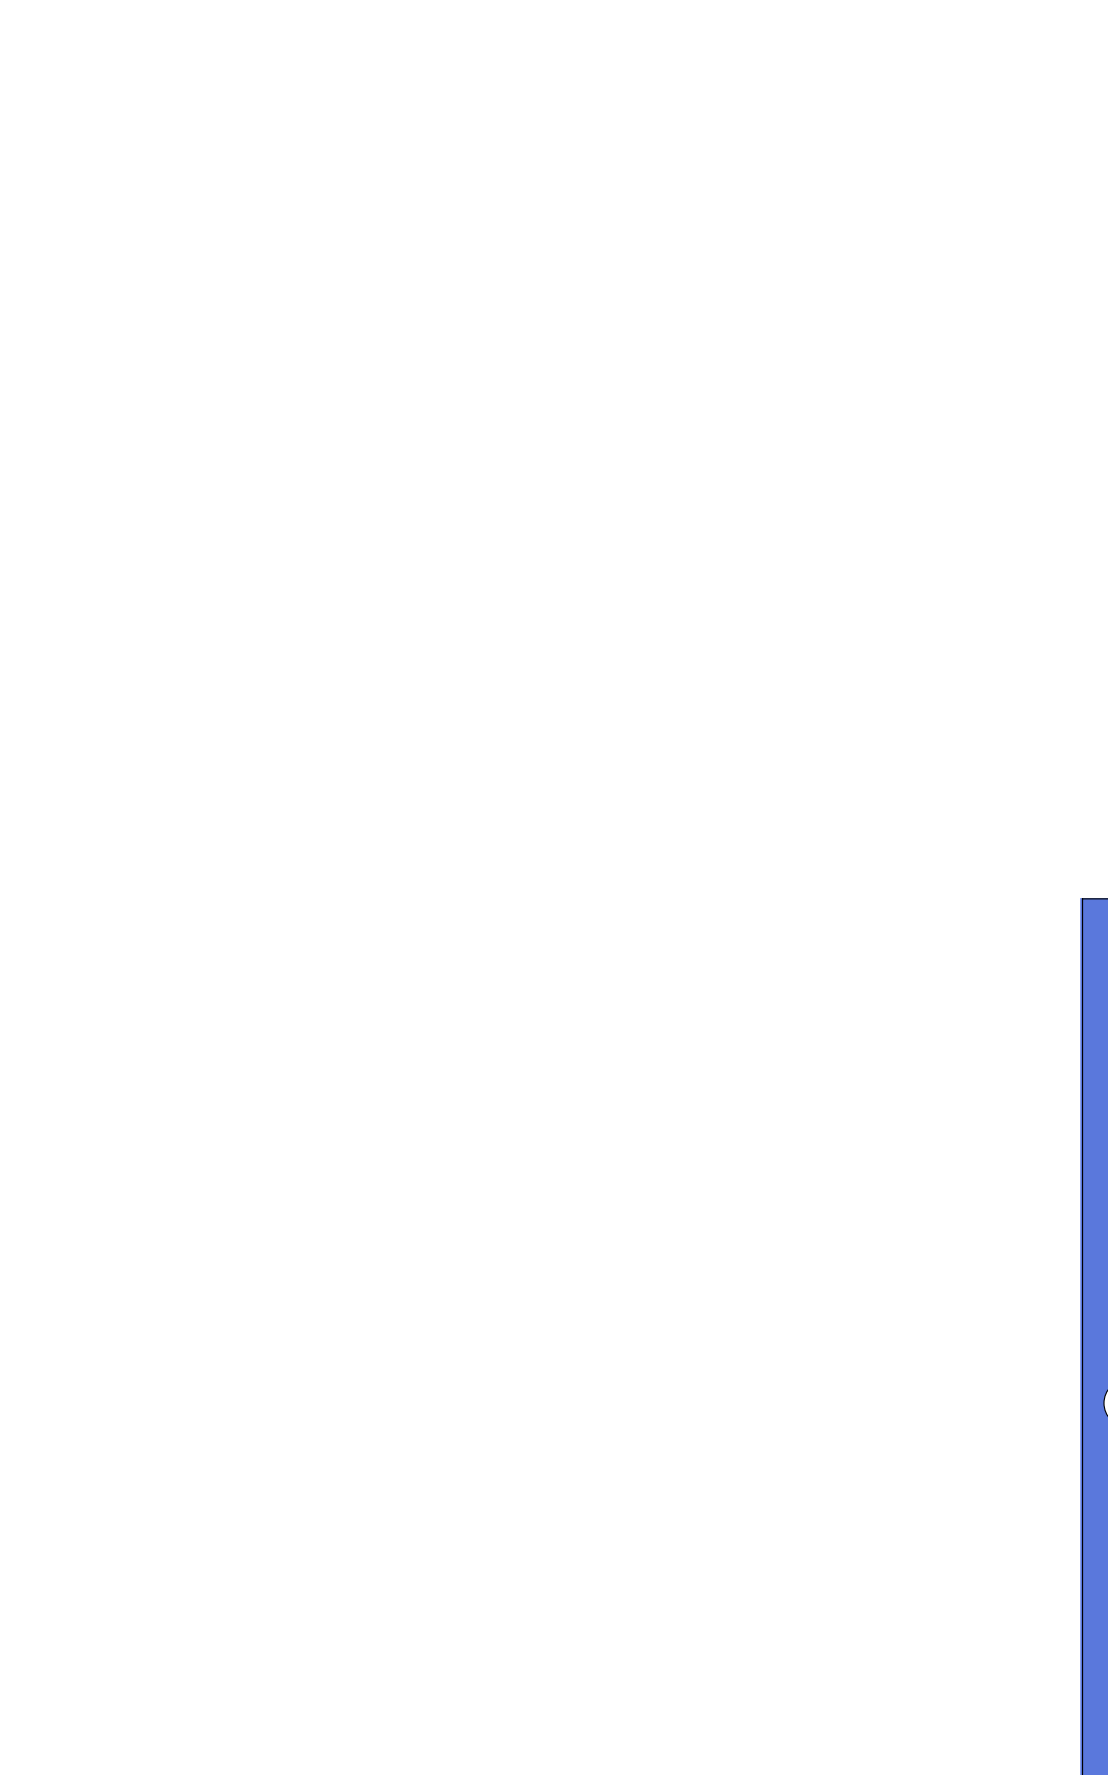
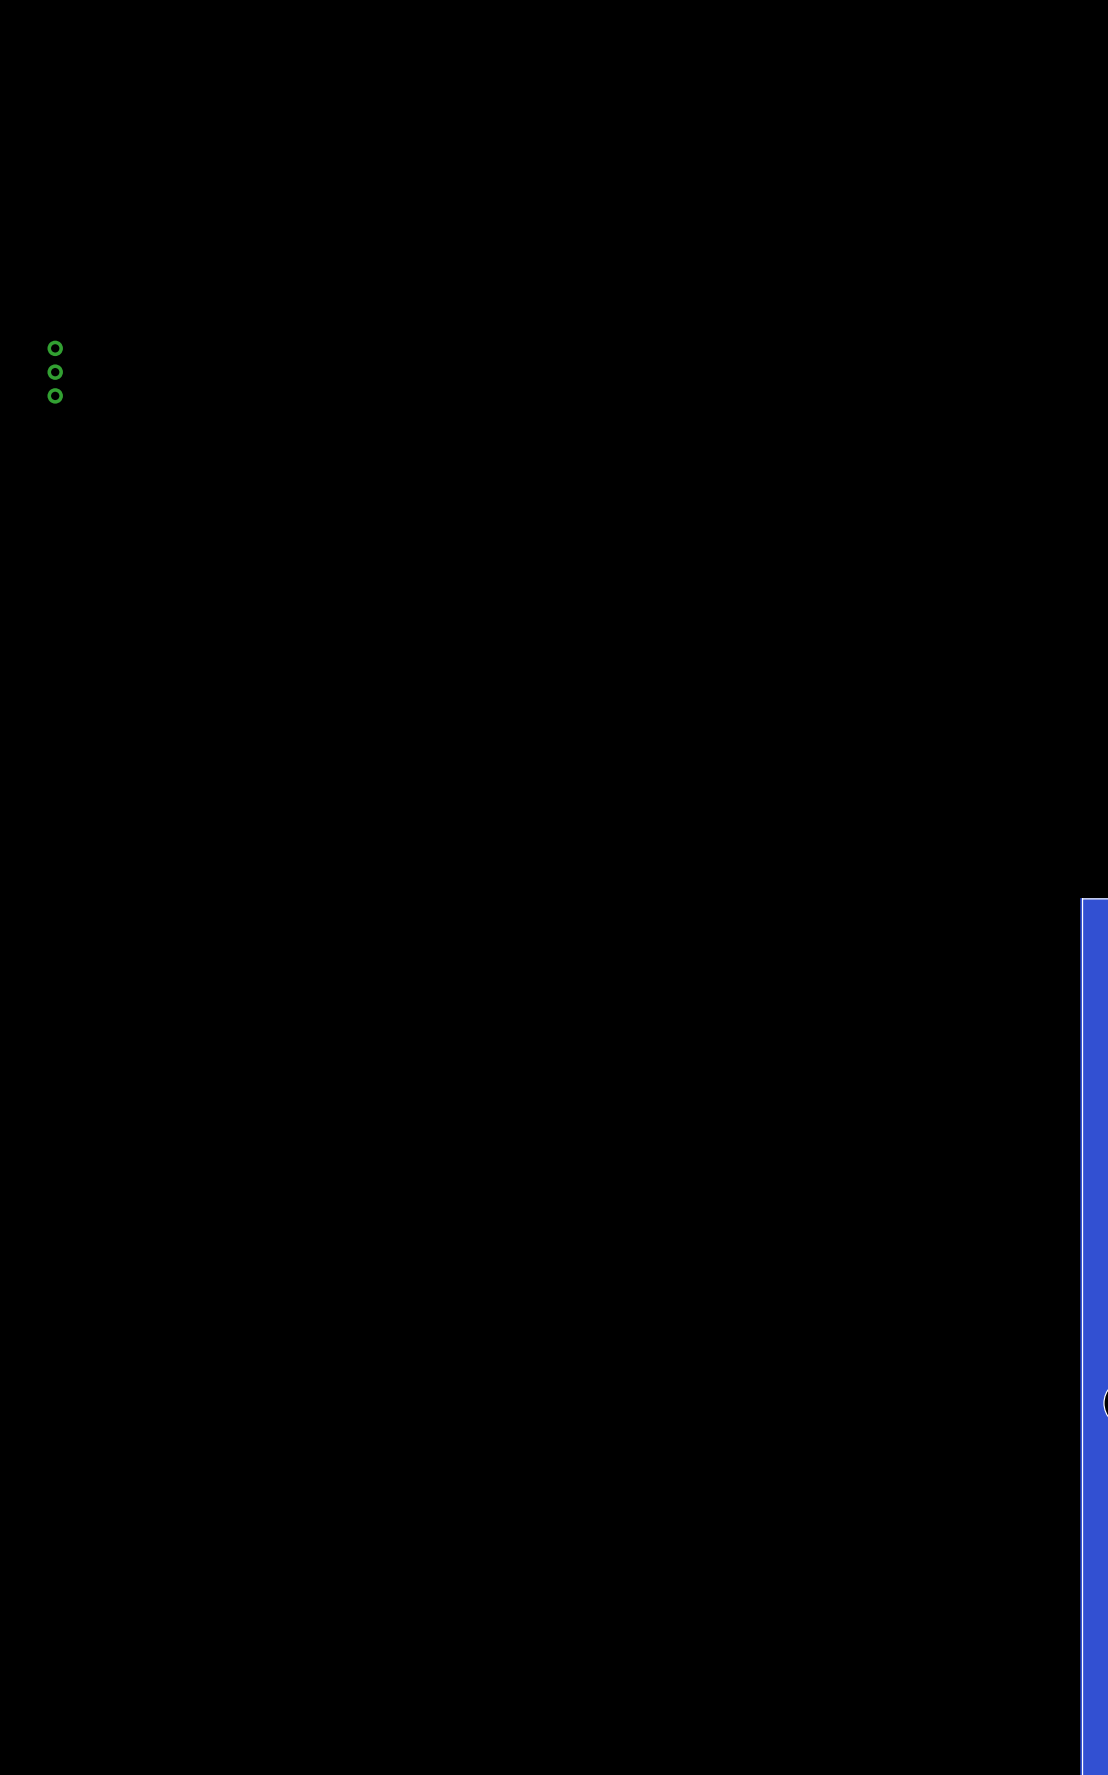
part: none -> (55, 372)

